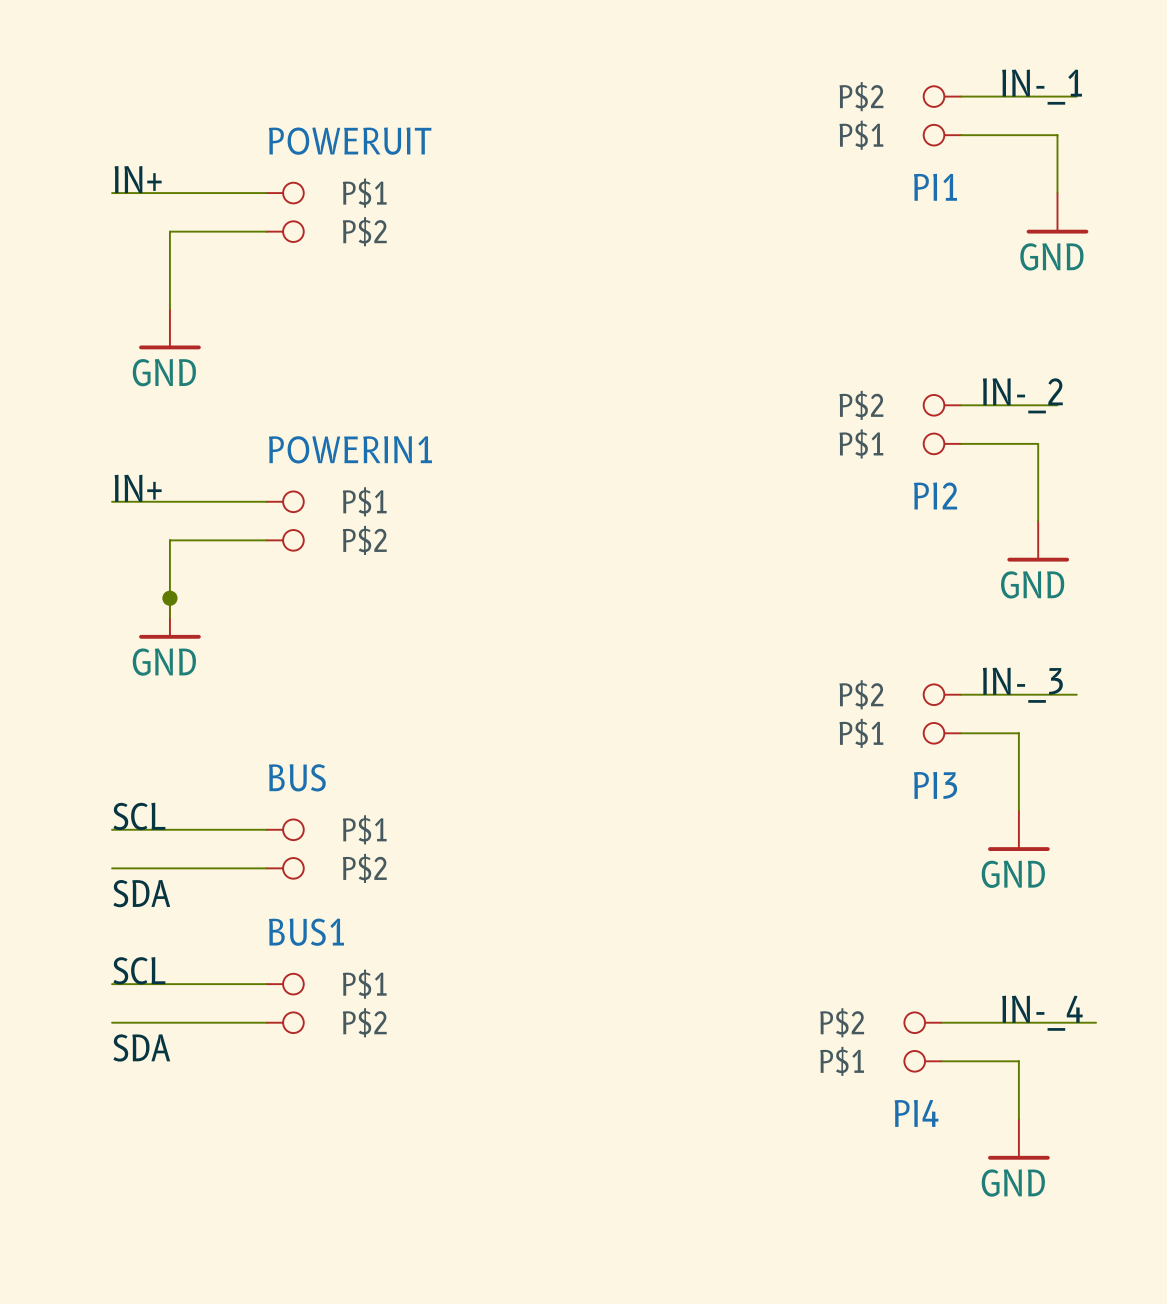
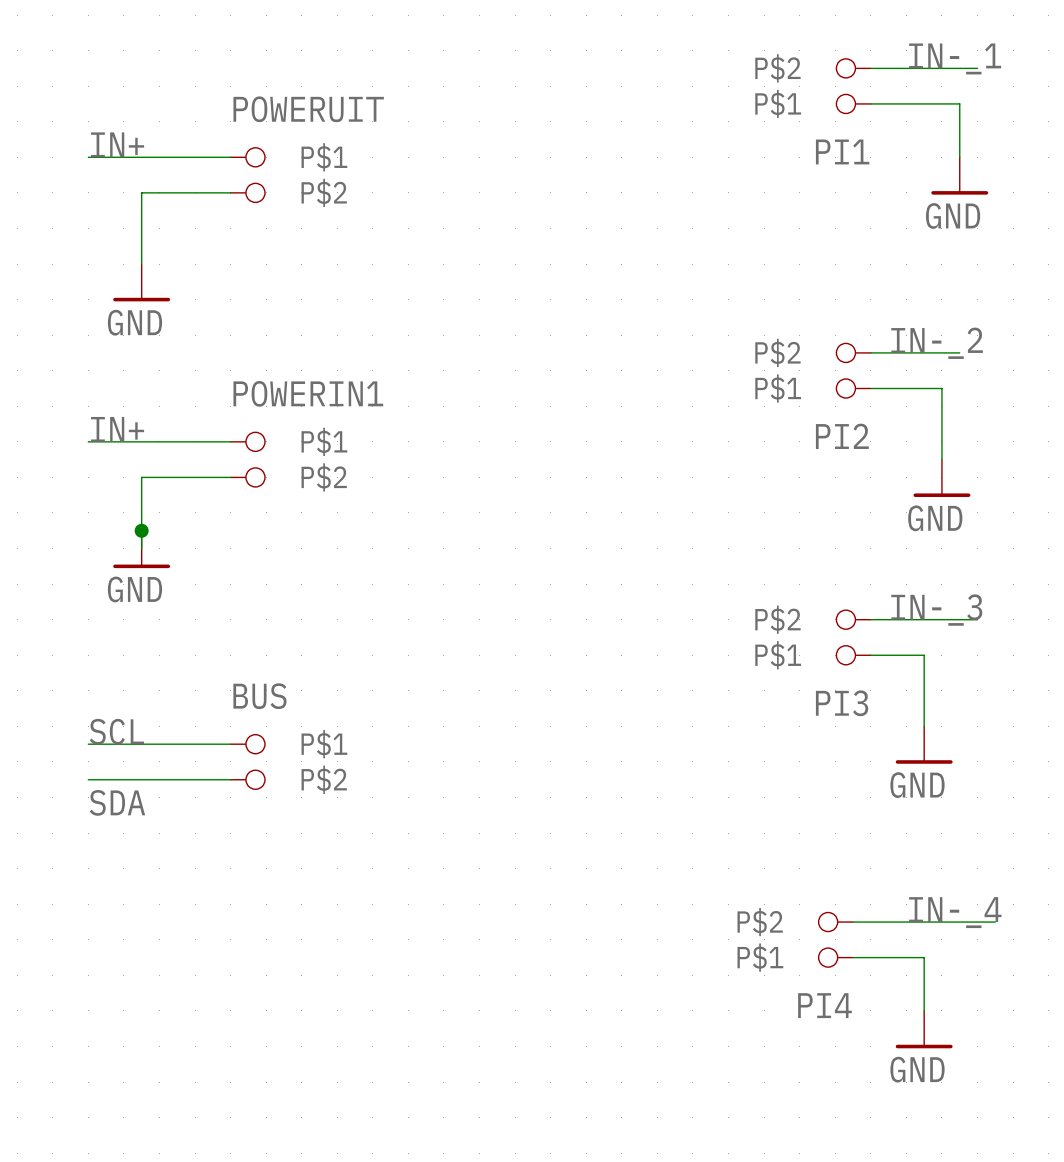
label: SCL (139, 970) -> none
wire: (112, 984) (266, 984) -> none
BUS1: (285, 1003) -> none
wire: (112, 1022) (266, 1022) -> none
label: SDA (141, 1047) -> none

